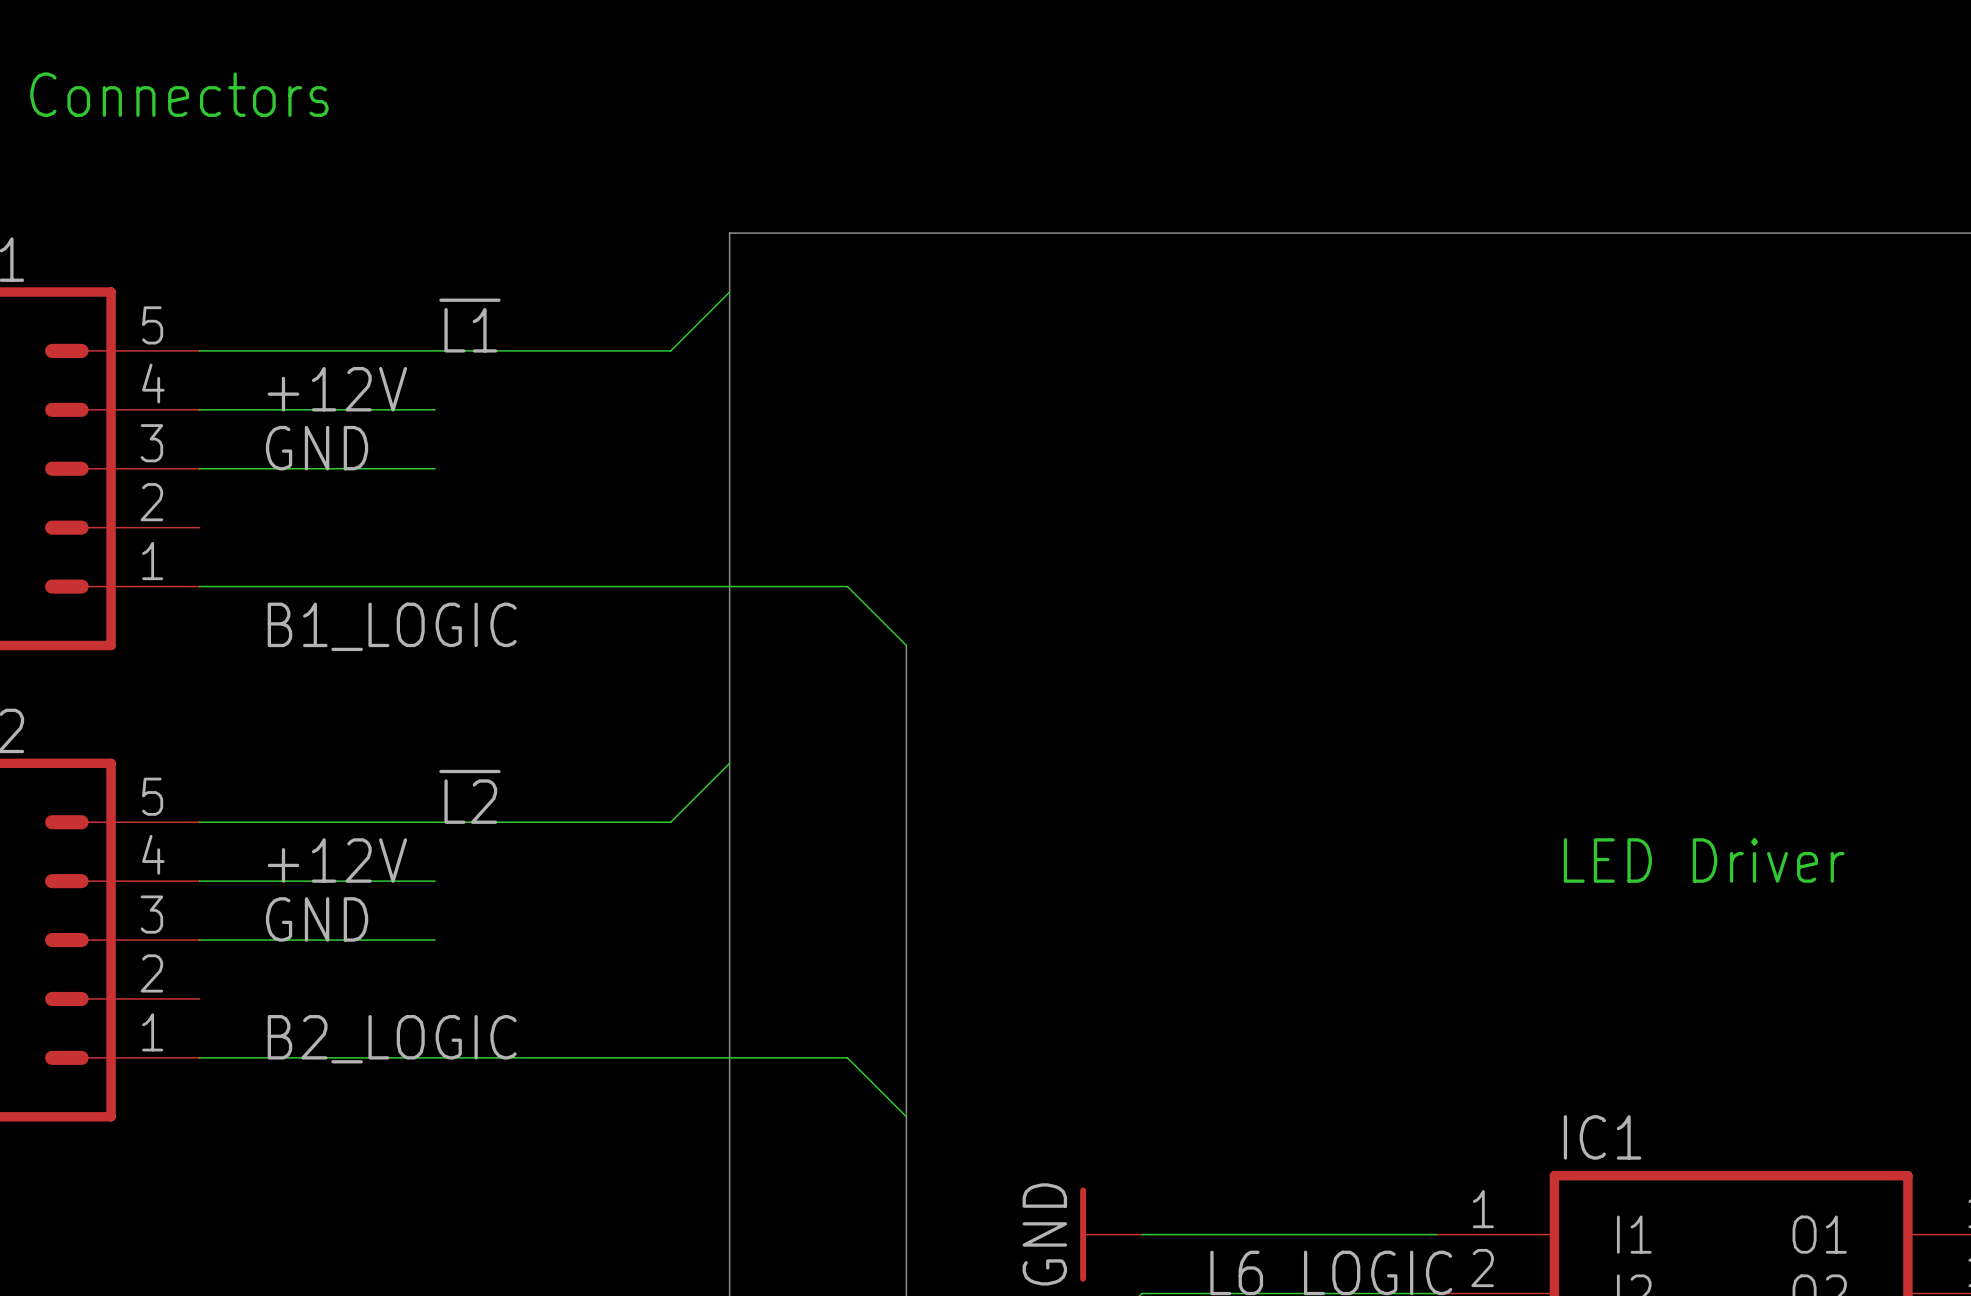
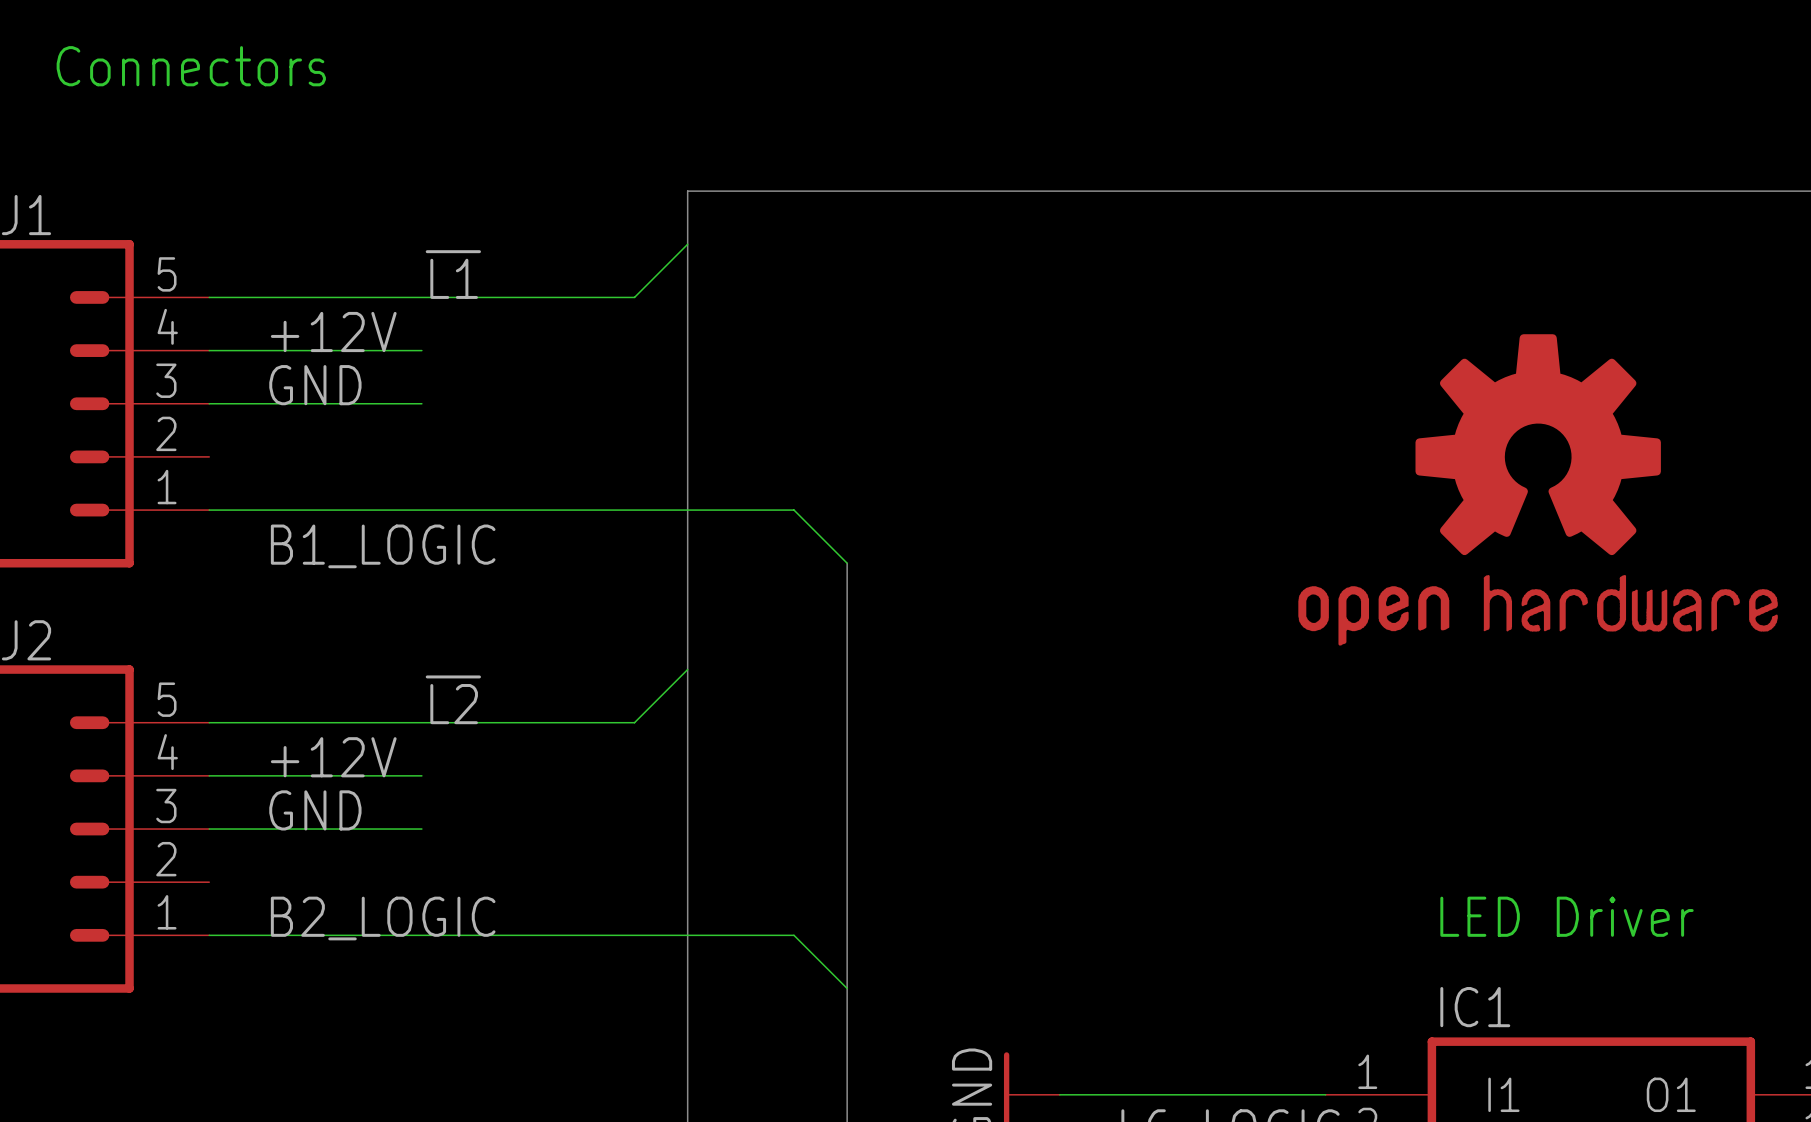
part: none -> (1538, 489)
text position: LED Driver (1704, 860) -> LED Driver (1567, 916)

